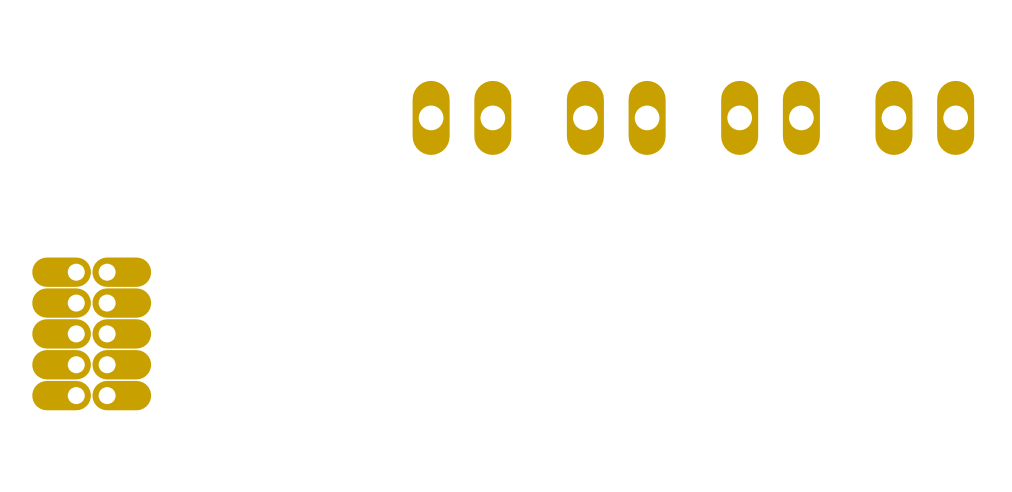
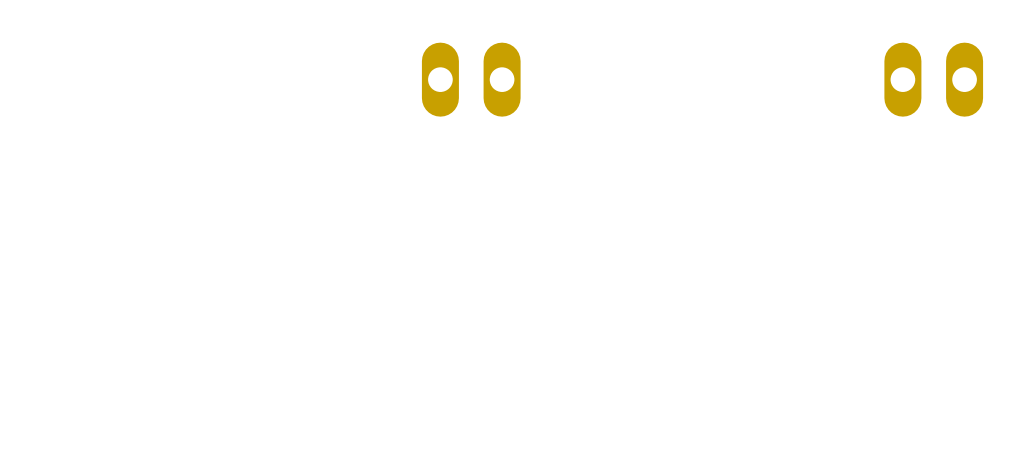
part: (616, 117) -> none
part: (770, 117) -> none
part: (91, 333) -> none

